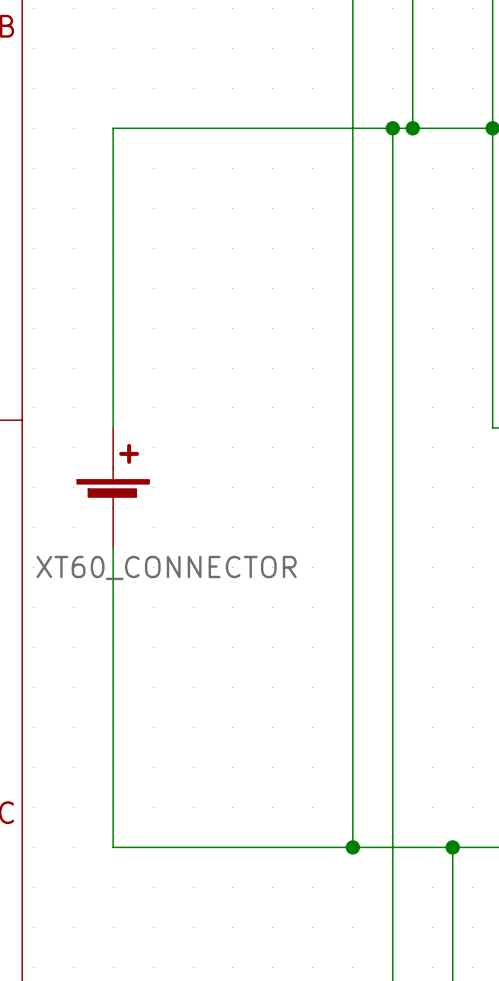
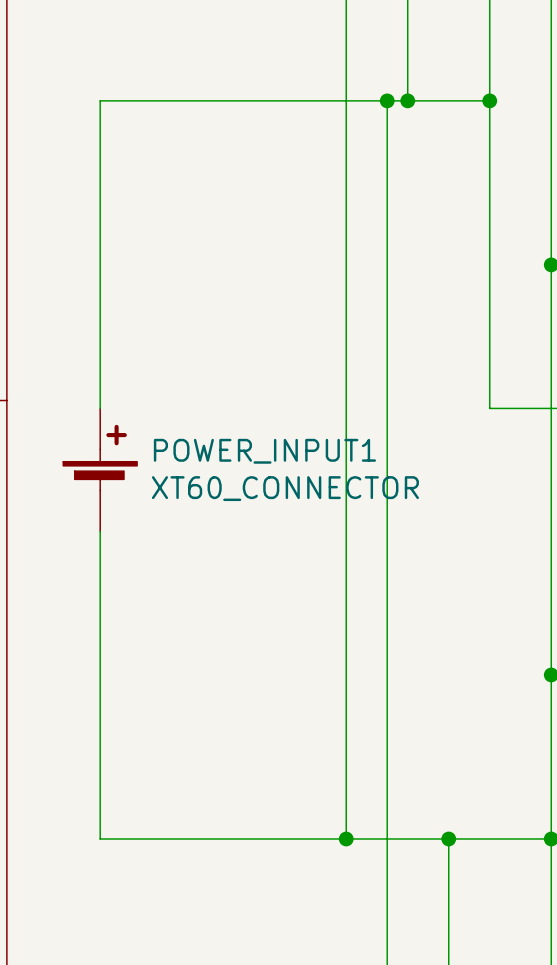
POWER_INPUT1 name: none -> POWER_INPUT1 (264, 451)
POWER_INPUT1 value position: XT60_CONNECTOR (166, 567) -> XT60_CONNECTOR (285, 488)

